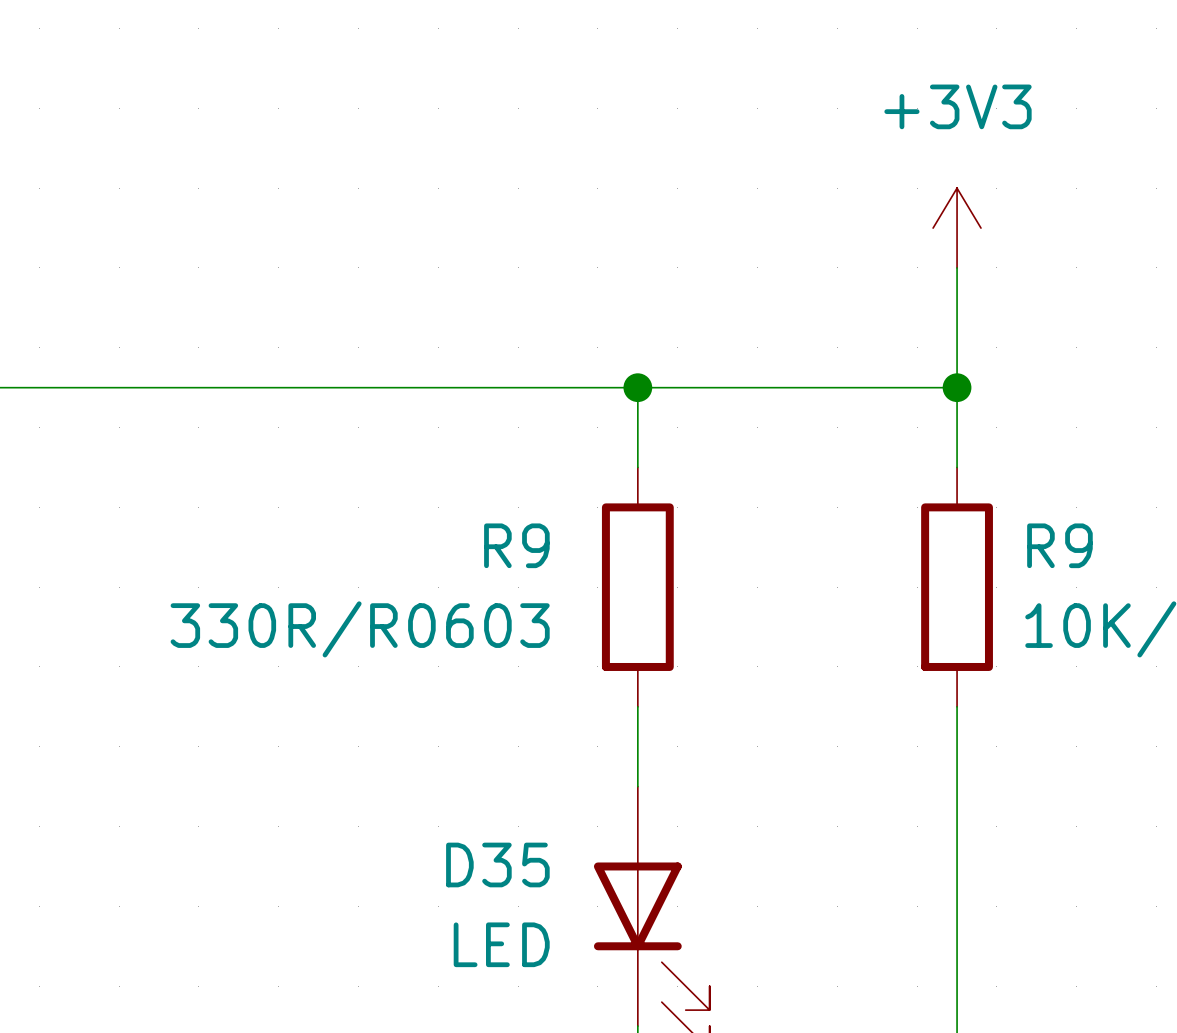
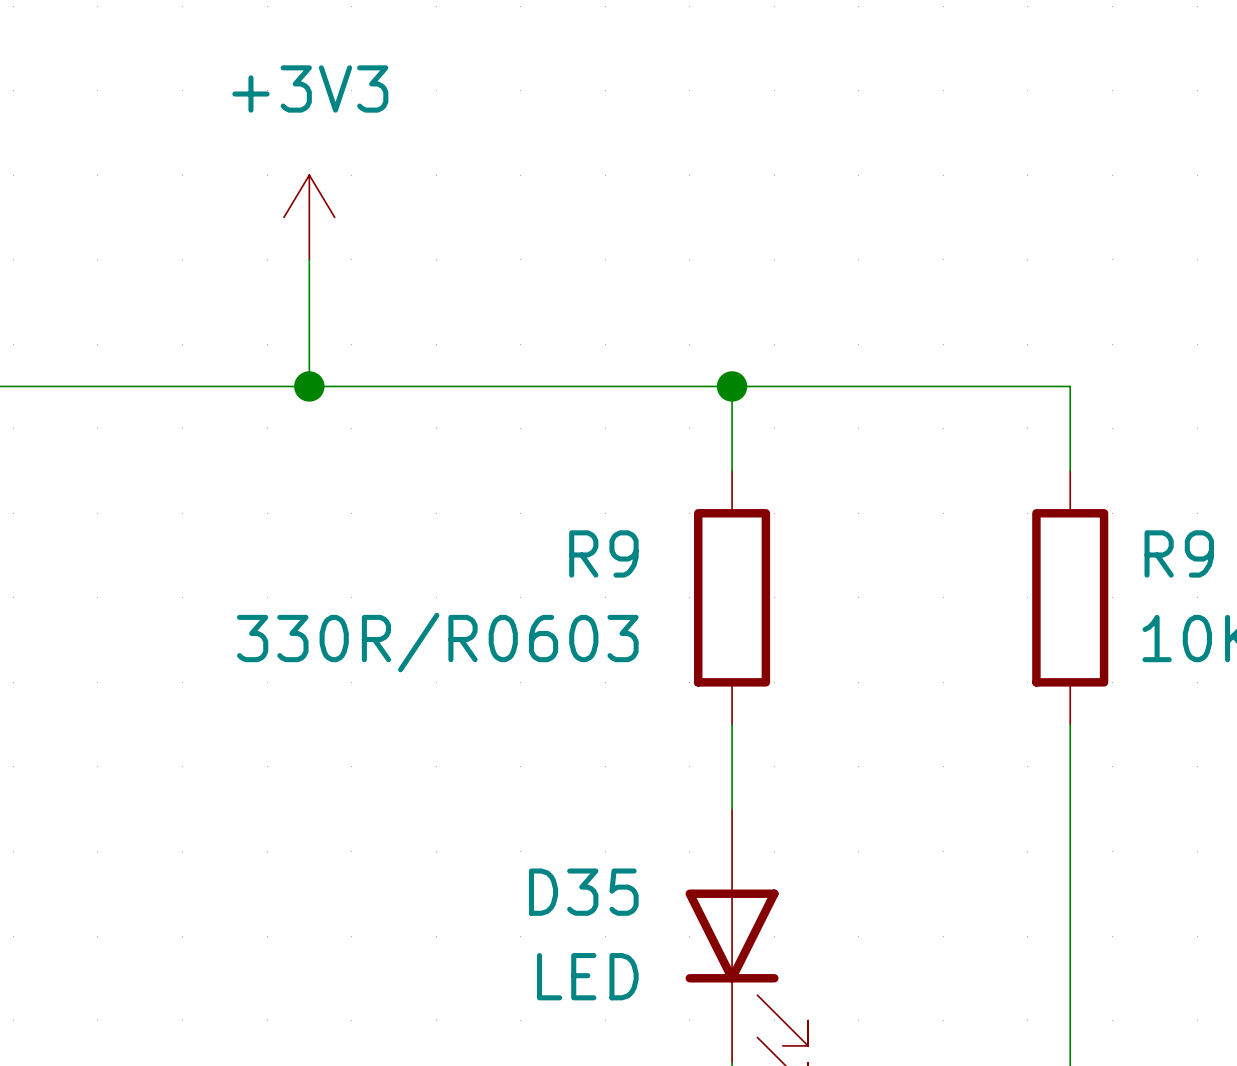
power symbol position: +3V3 (957, 228) -> +3V3 (309, 217)
wire: (957, 267) (957, 387) -> (309, 259) (309, 386)
junction: none -> (309, 386)
junction: (957, 387) -> none

